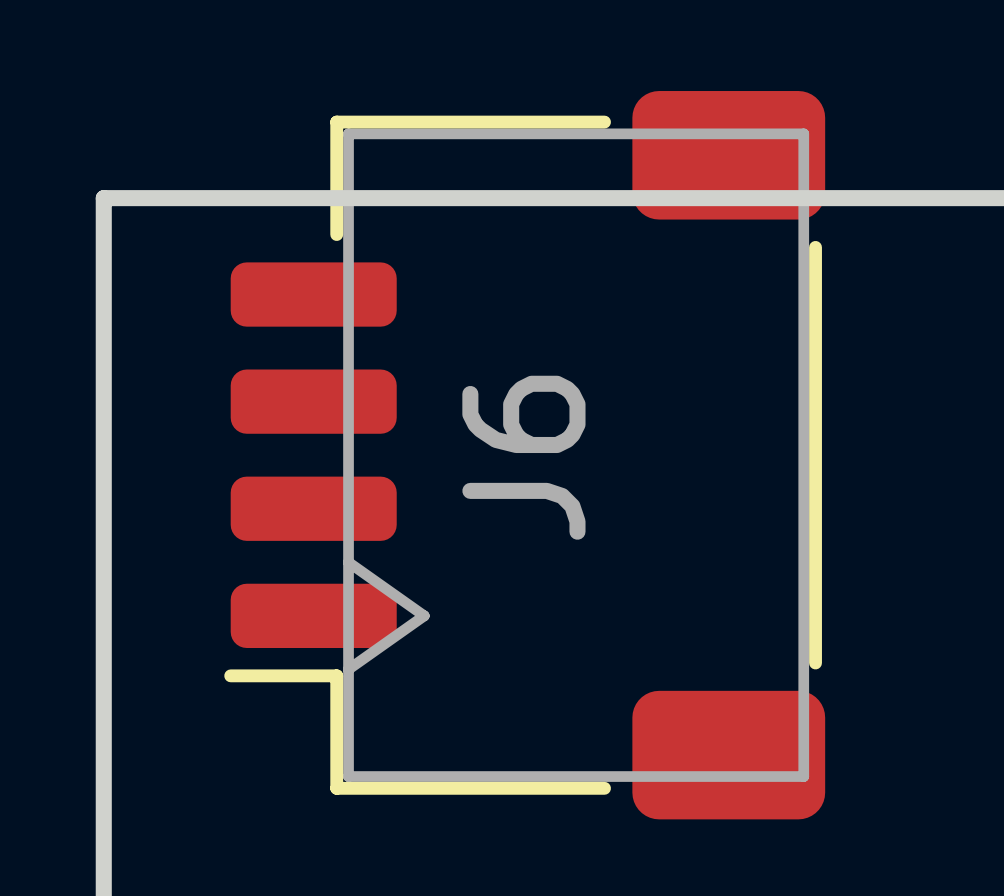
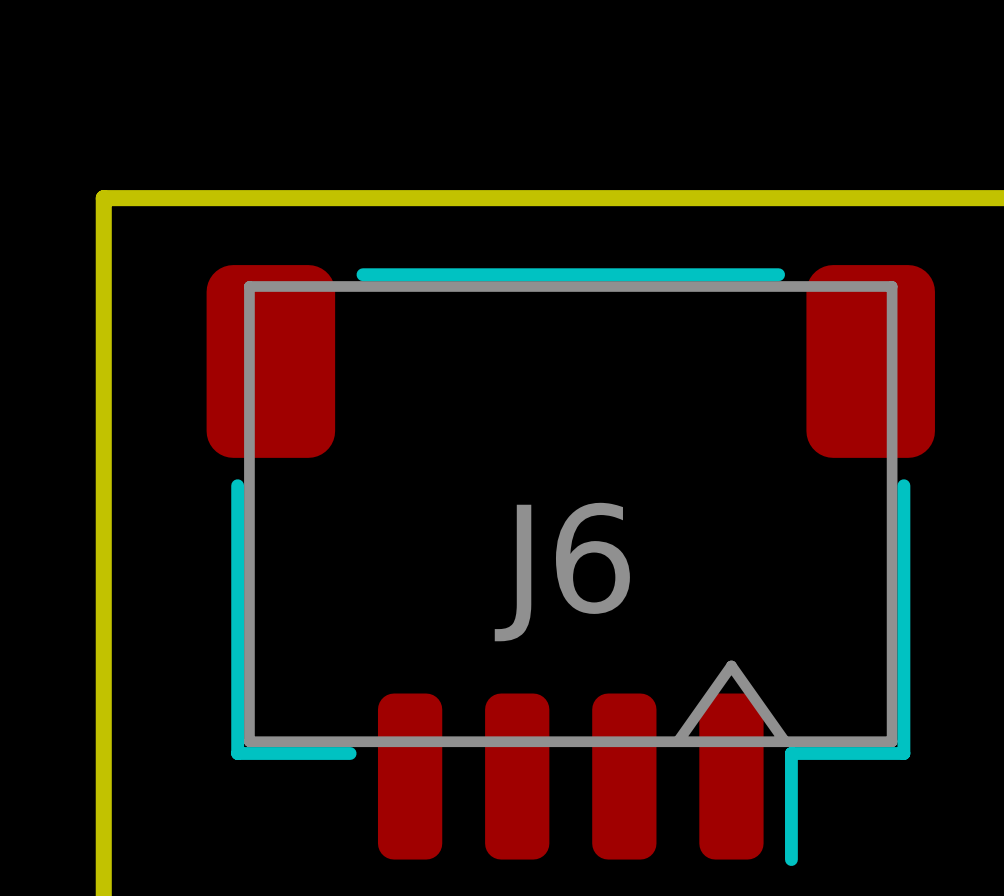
J6 rotation: 0° (524, 455) -> 90° counterclockwise (570, 565)

